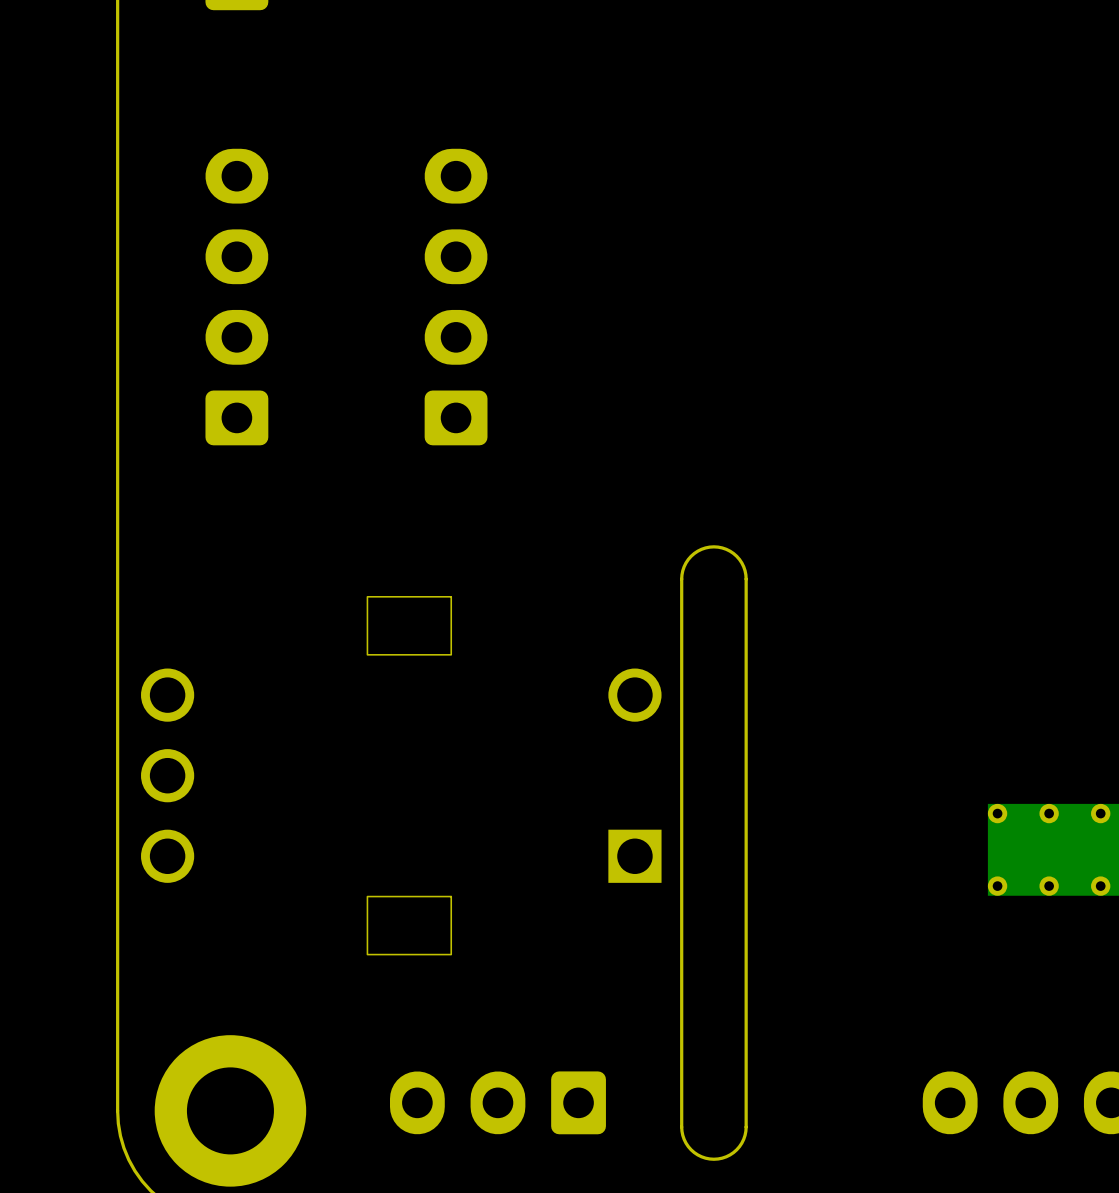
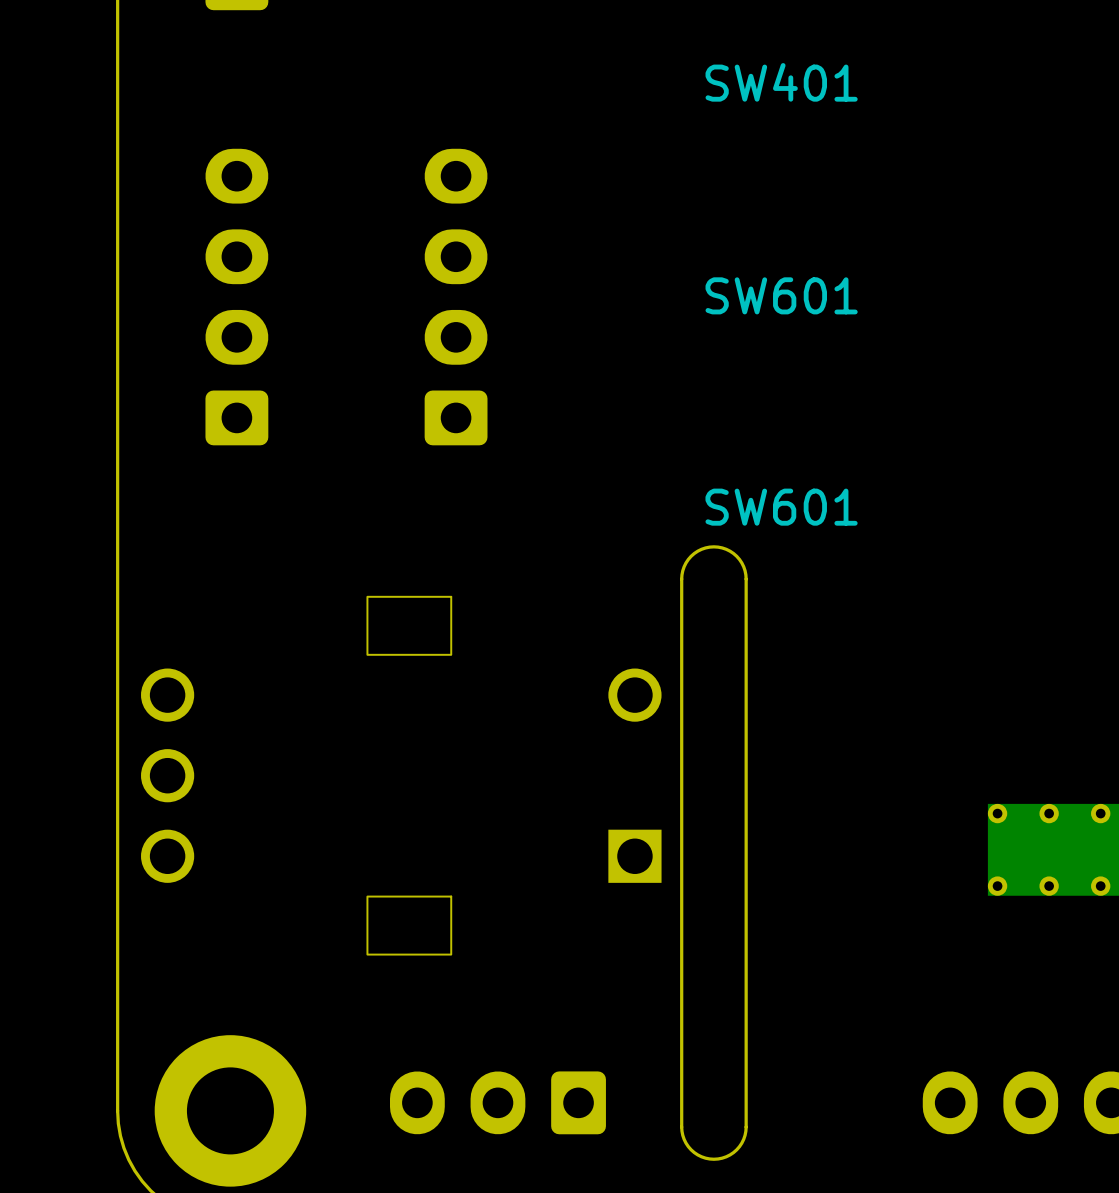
SW401: none -> (781, 82)
SW601: none -> (781, 295)
text: none -> SW601 (781, 507)

